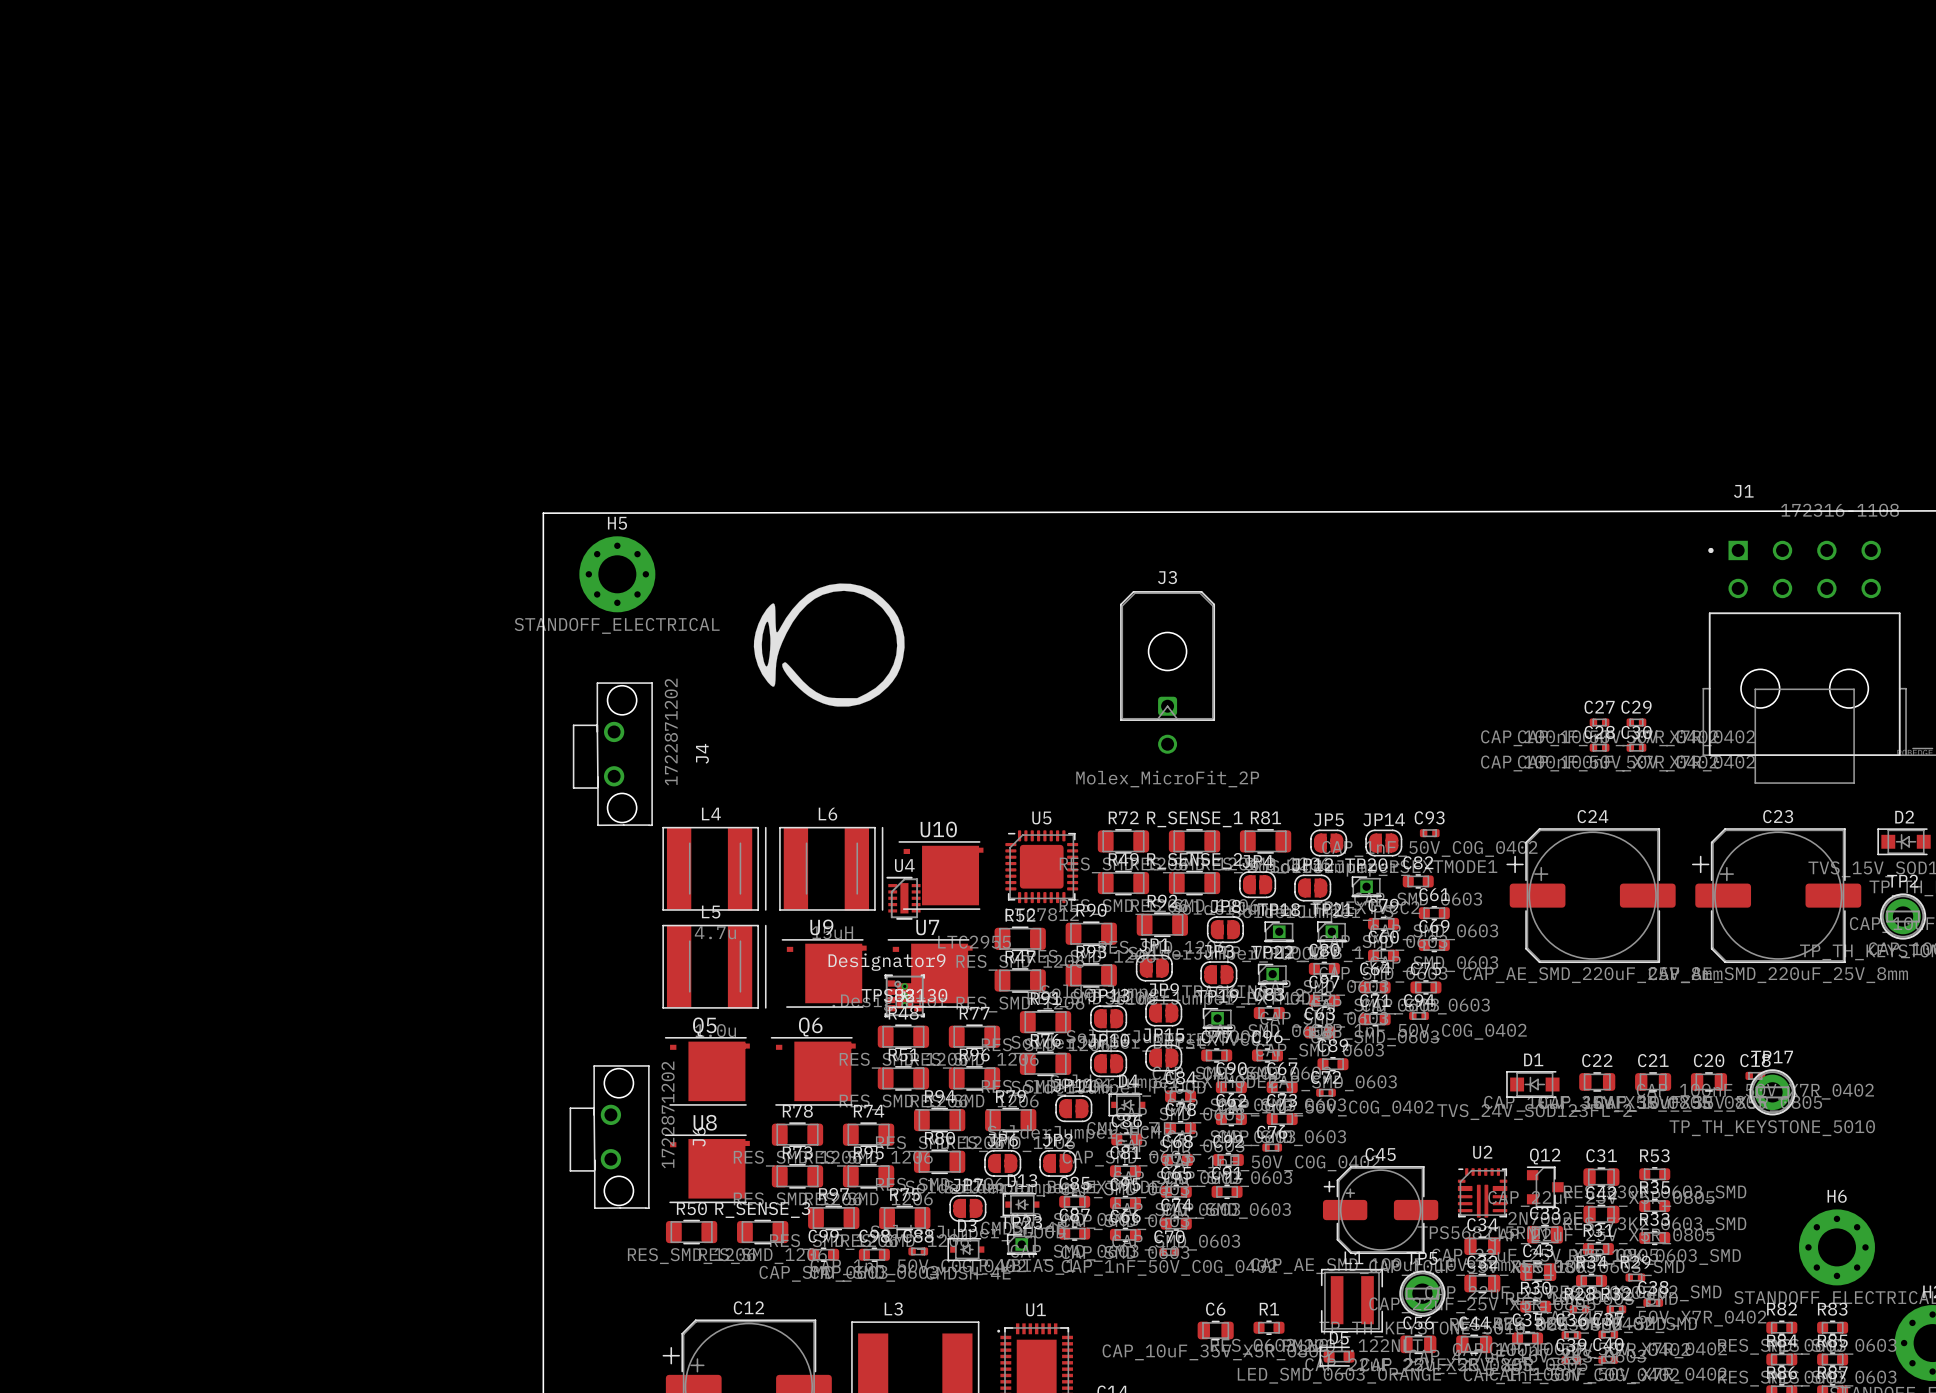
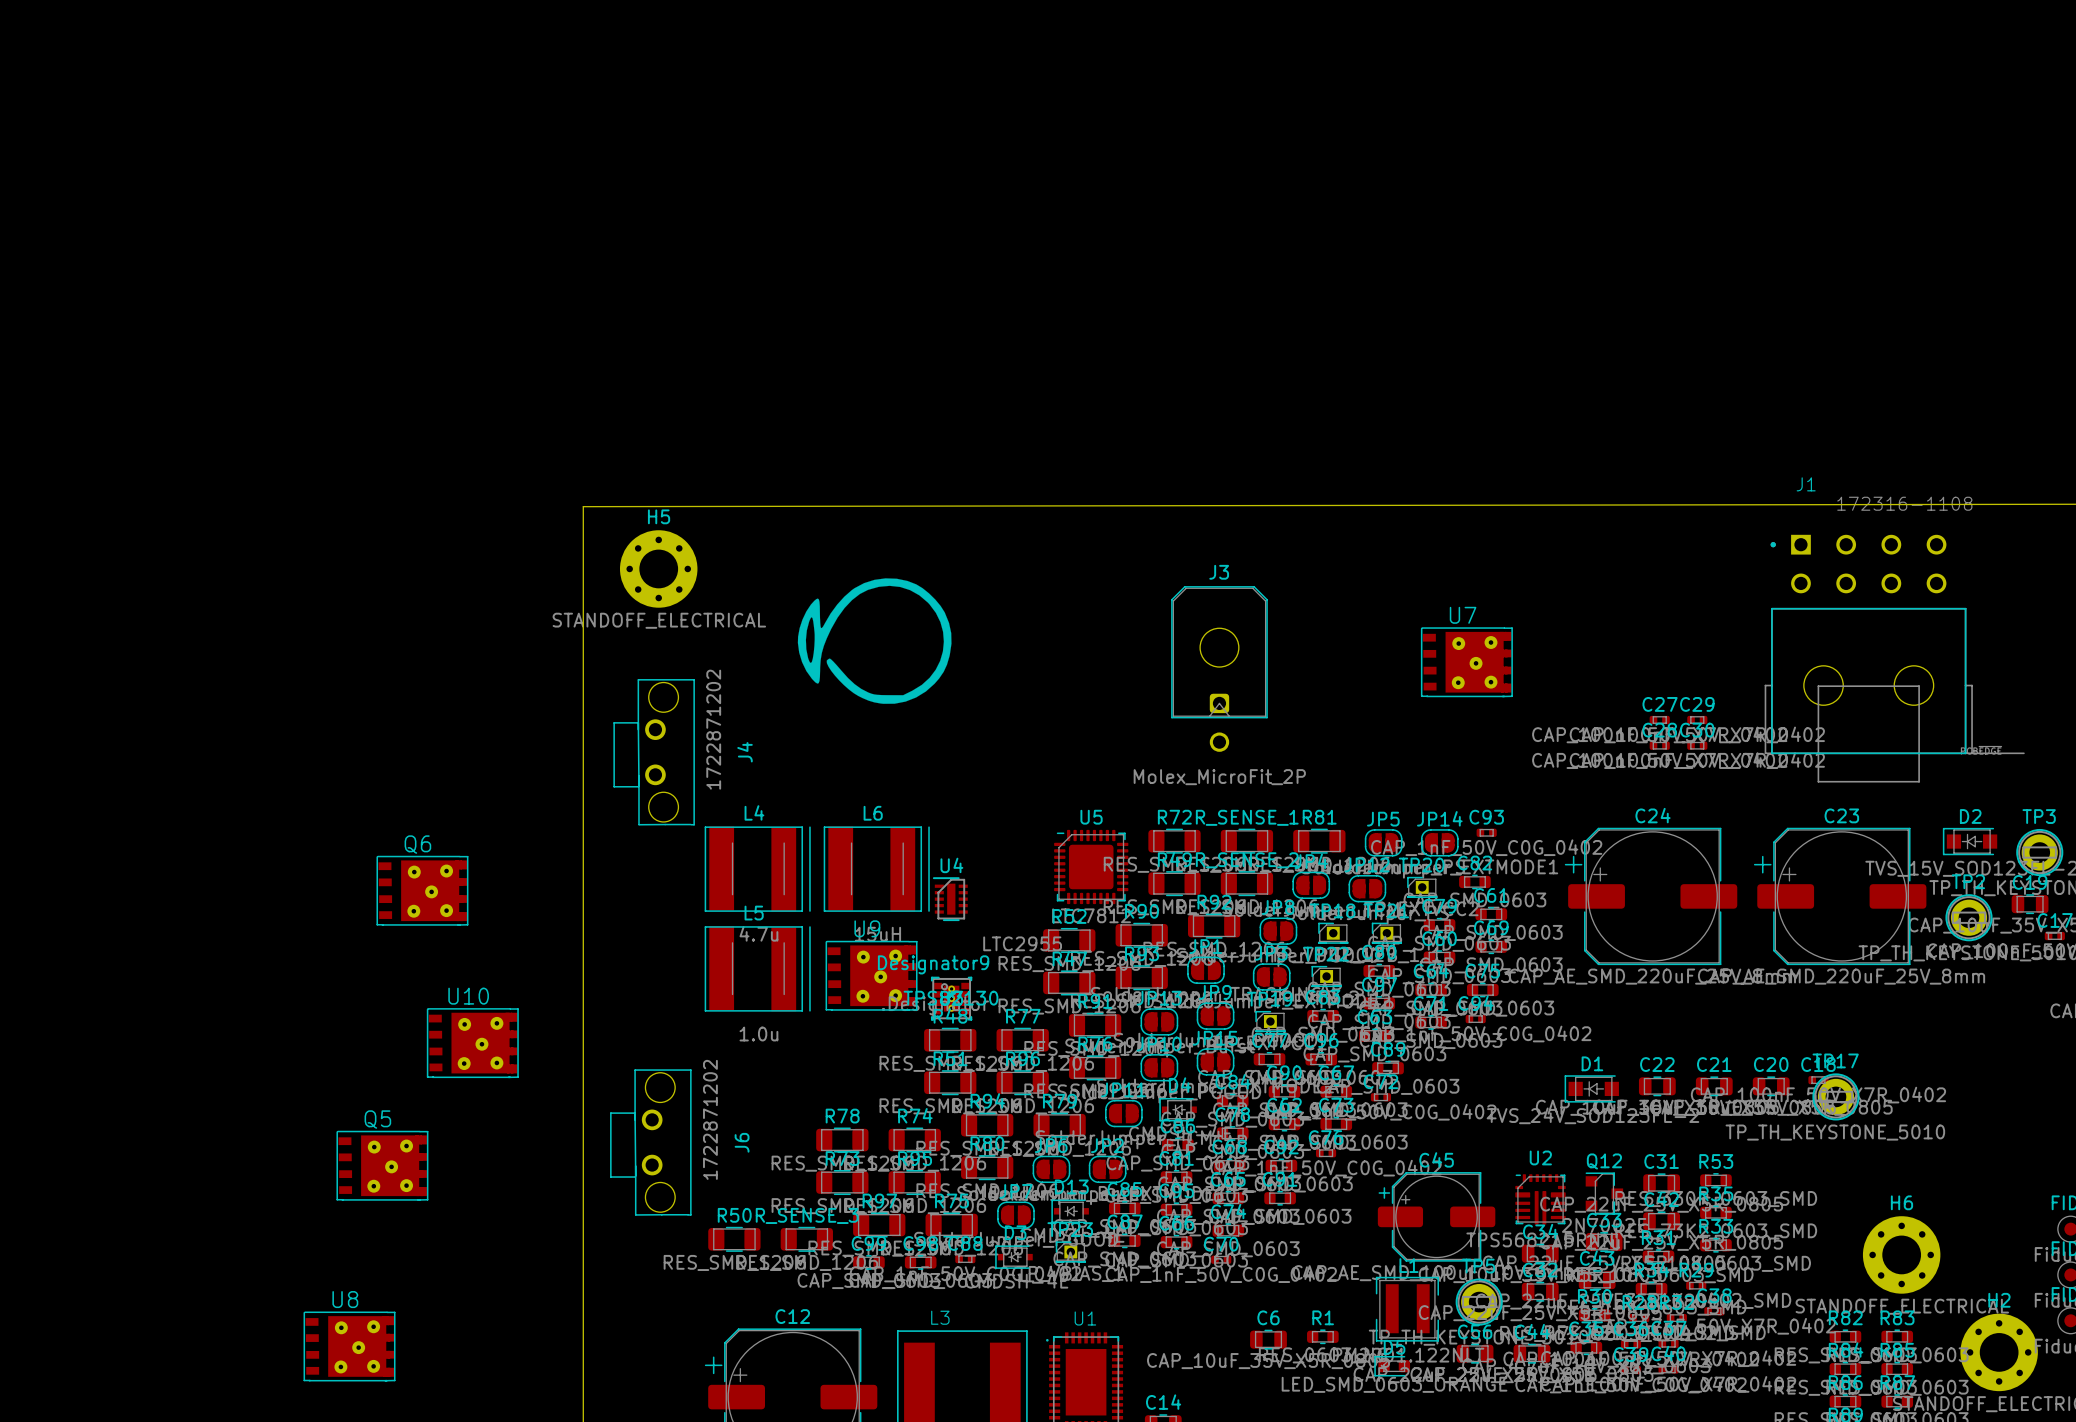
U10 footprint: [898, 841, 984, 910] -> [426, 1008, 519, 1079]
U9 footprint: [781, 939, 867, 1008] -> [825, 940, 918, 1011]
U7 footprint: [887, 939, 973, 1008] -> [1420, 627, 1513, 698]
Q5 footprint: [664, 1037, 750, 1106] -> [336, 1130, 429, 1201]
Q6 footprint: [770, 1037, 856, 1106] -> [376, 855, 469, 926]
U8 footprint: [664, 1134, 750, 1204] -> [303, 1311, 396, 1382]

